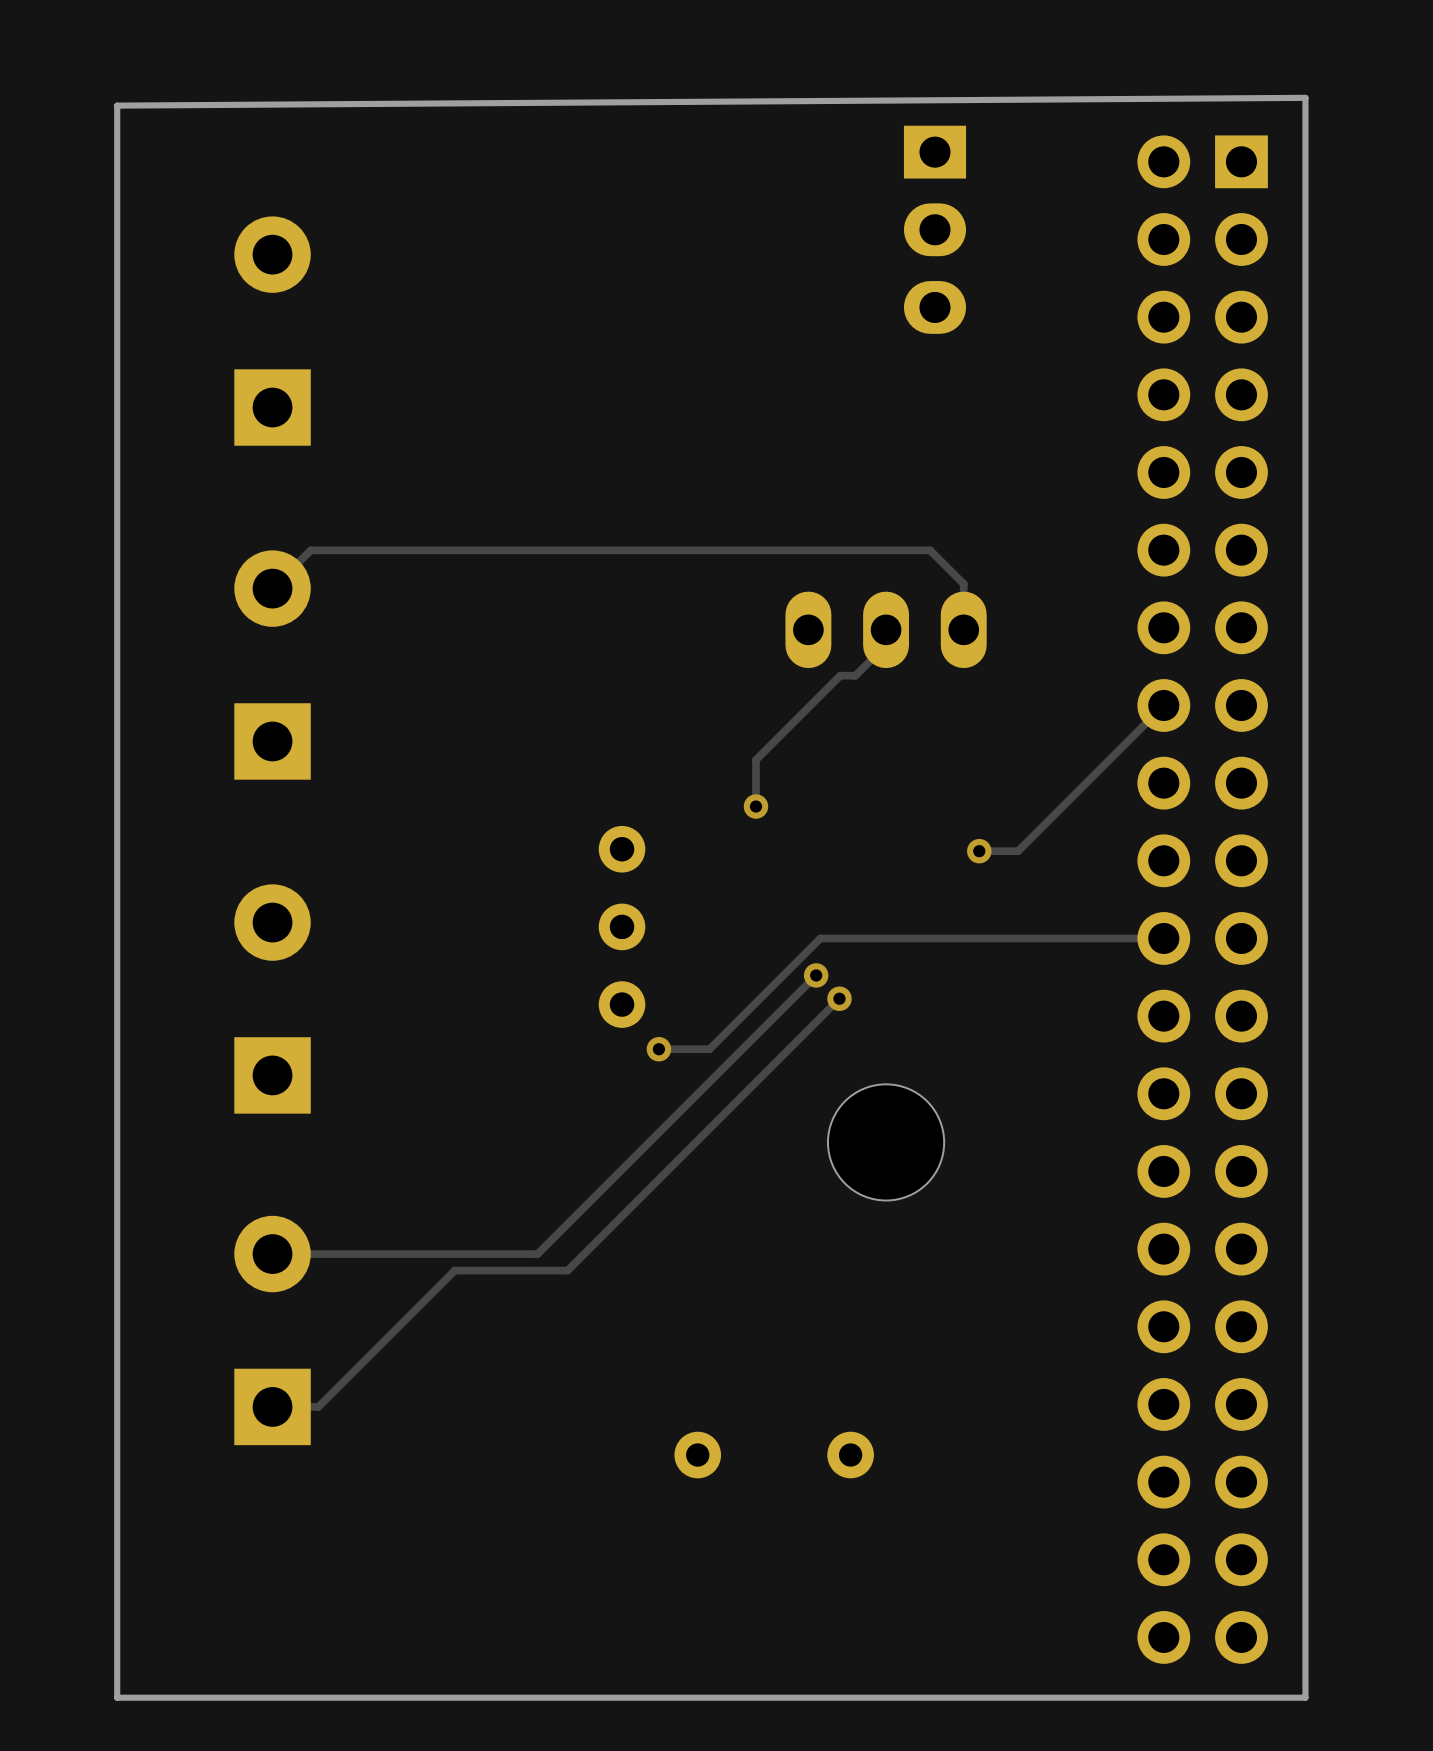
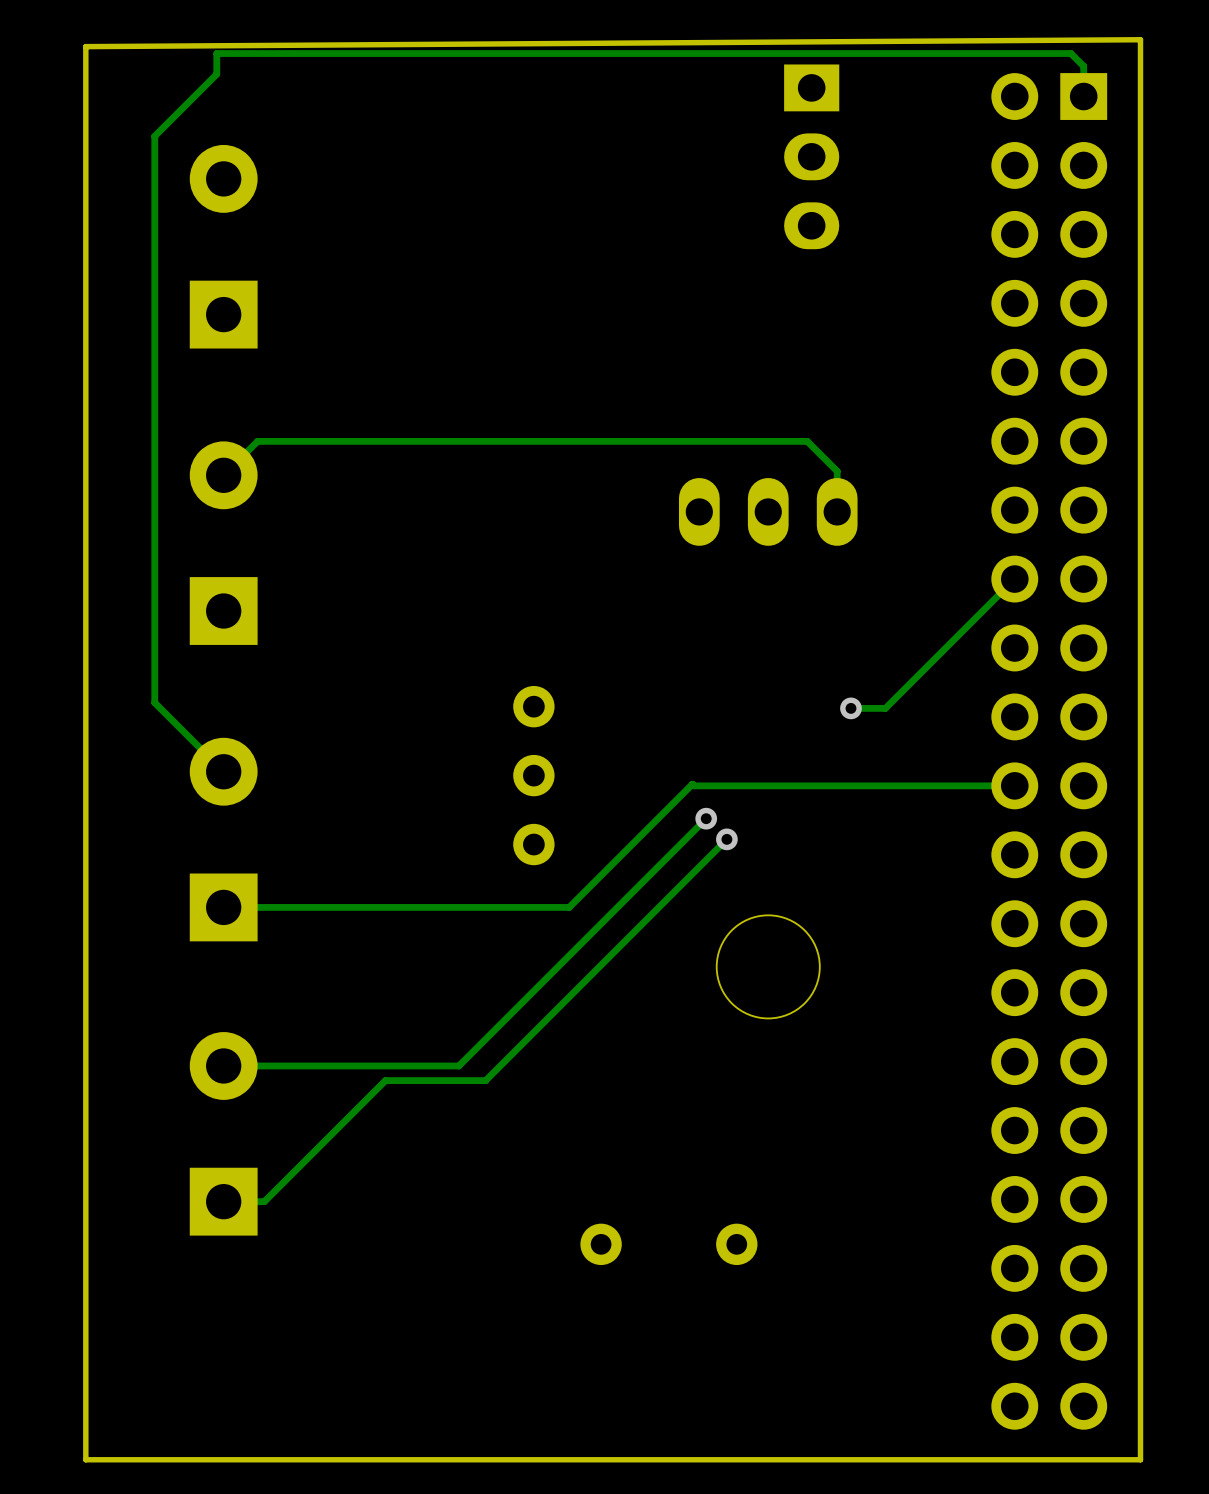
track: none -> (1083, 96) (1083, 66) (1070, 53) (216, 53) (216, 74) (154, 136) (154, 702) (223, 771)
track: (886, 629) (886, 645) (855, 675) (840, 675) (755, 759) (755, 806) -> none
via: (755, 806) -> none
track: (820, 938) (709, 1049) (658, 1049) -> (709, 785) (692, 784) (569, 907) (223, 907)
via: (658, 1049) -> none

